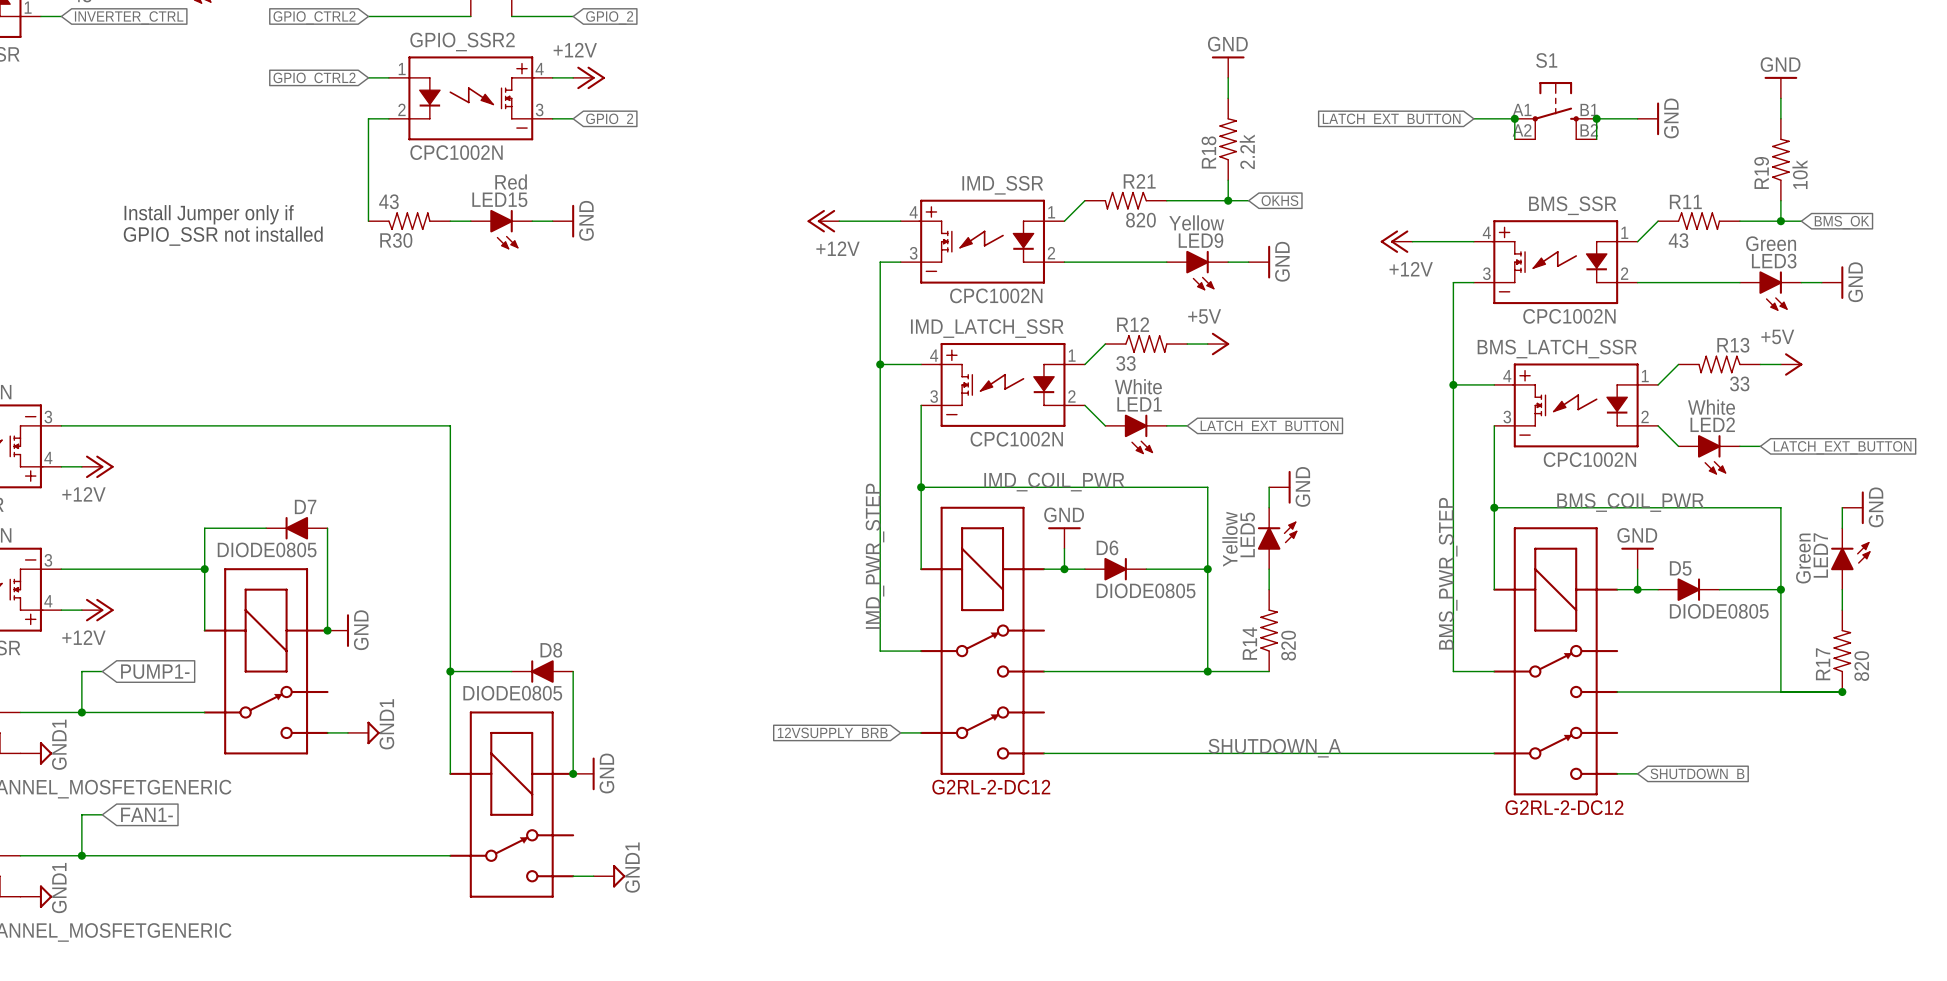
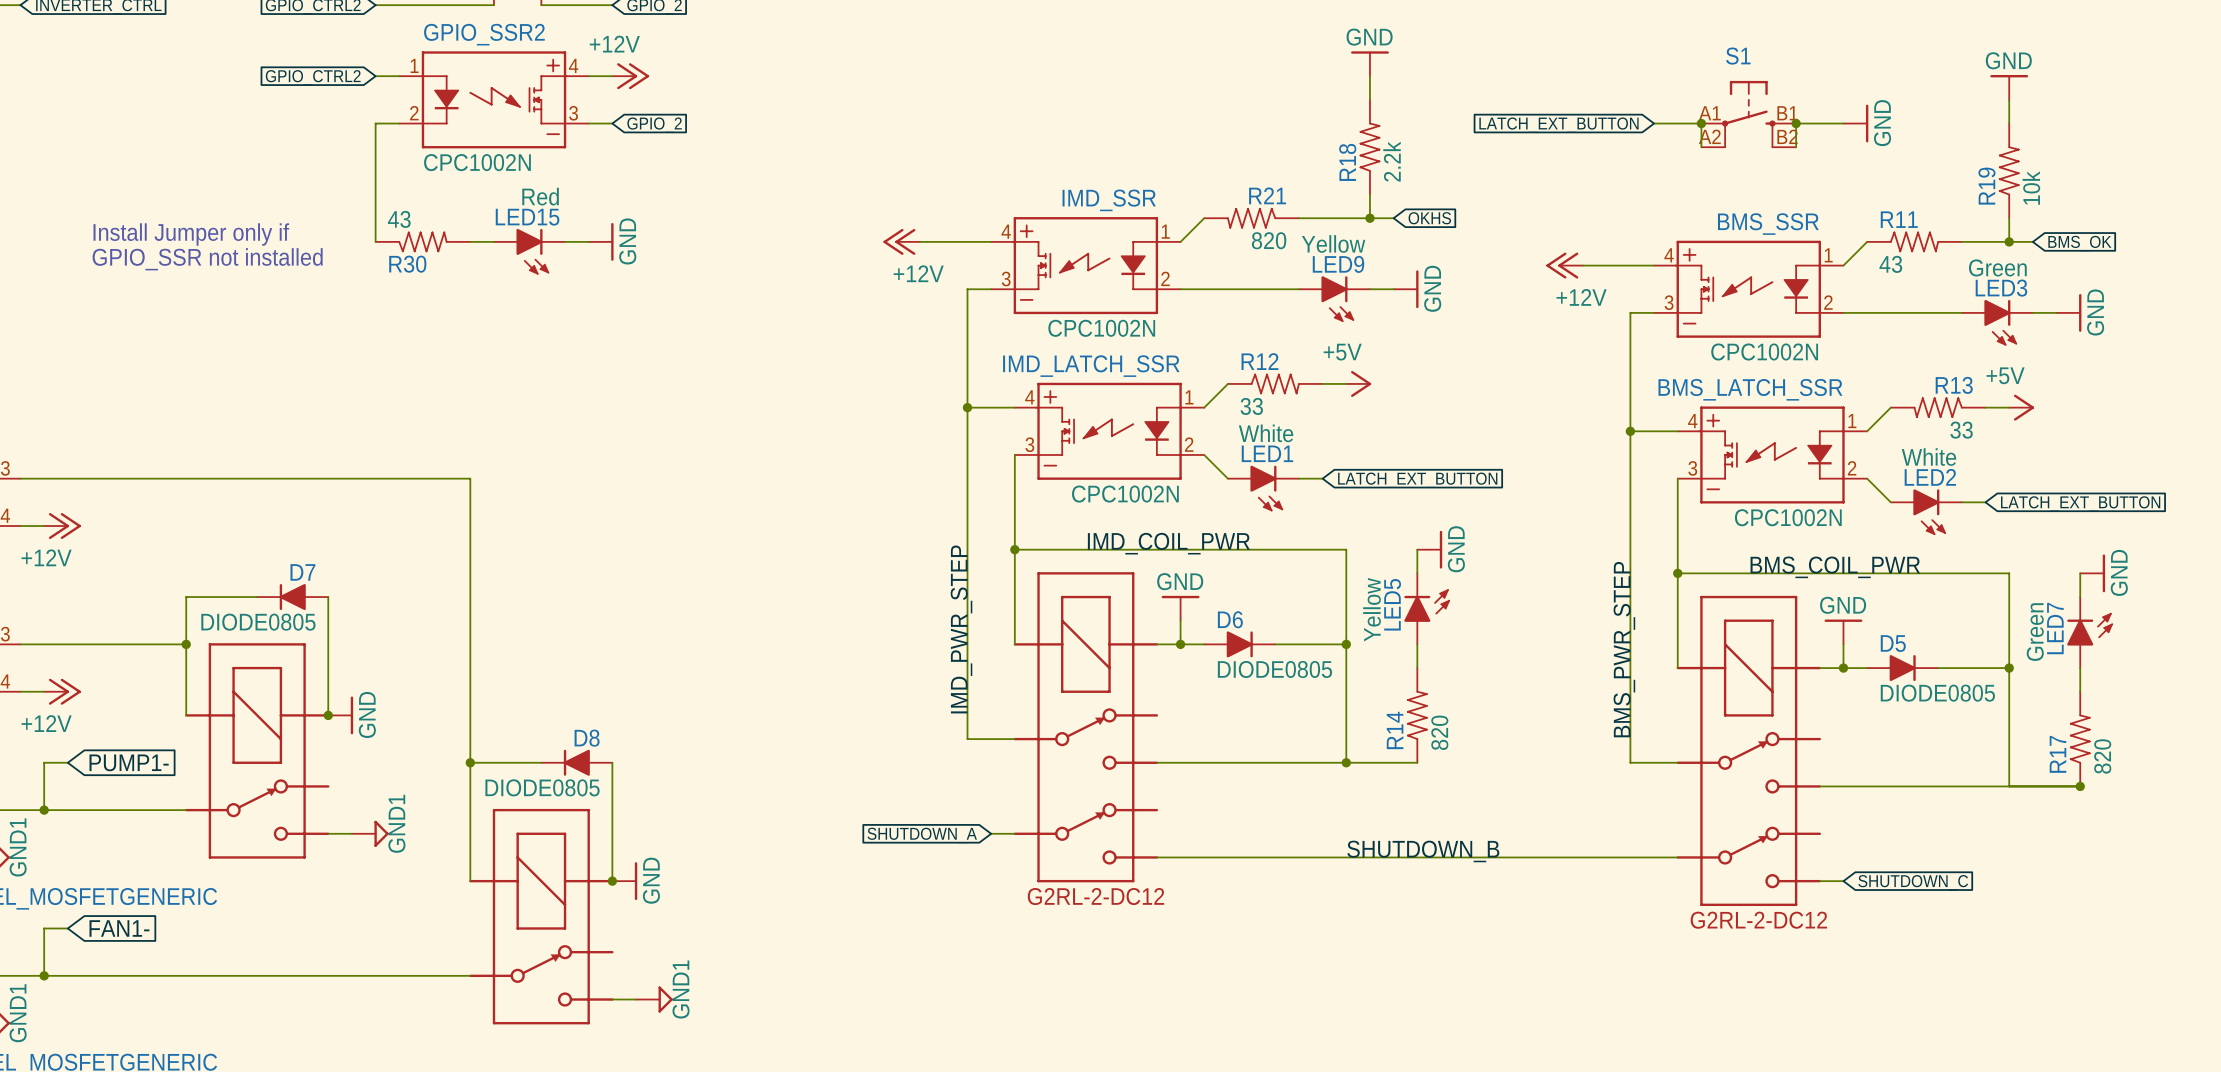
global label: 12VSUPPLY_BRB (832, 734) -> SHUTDOWN_A (922, 835)
label: SHUTDOWN_A (1274, 748) -> SHUTDOWN_B (1423, 851)
global label: SHUTDOWN_B (1697, 775) -> SHUTDOWN_C (1913, 882)

